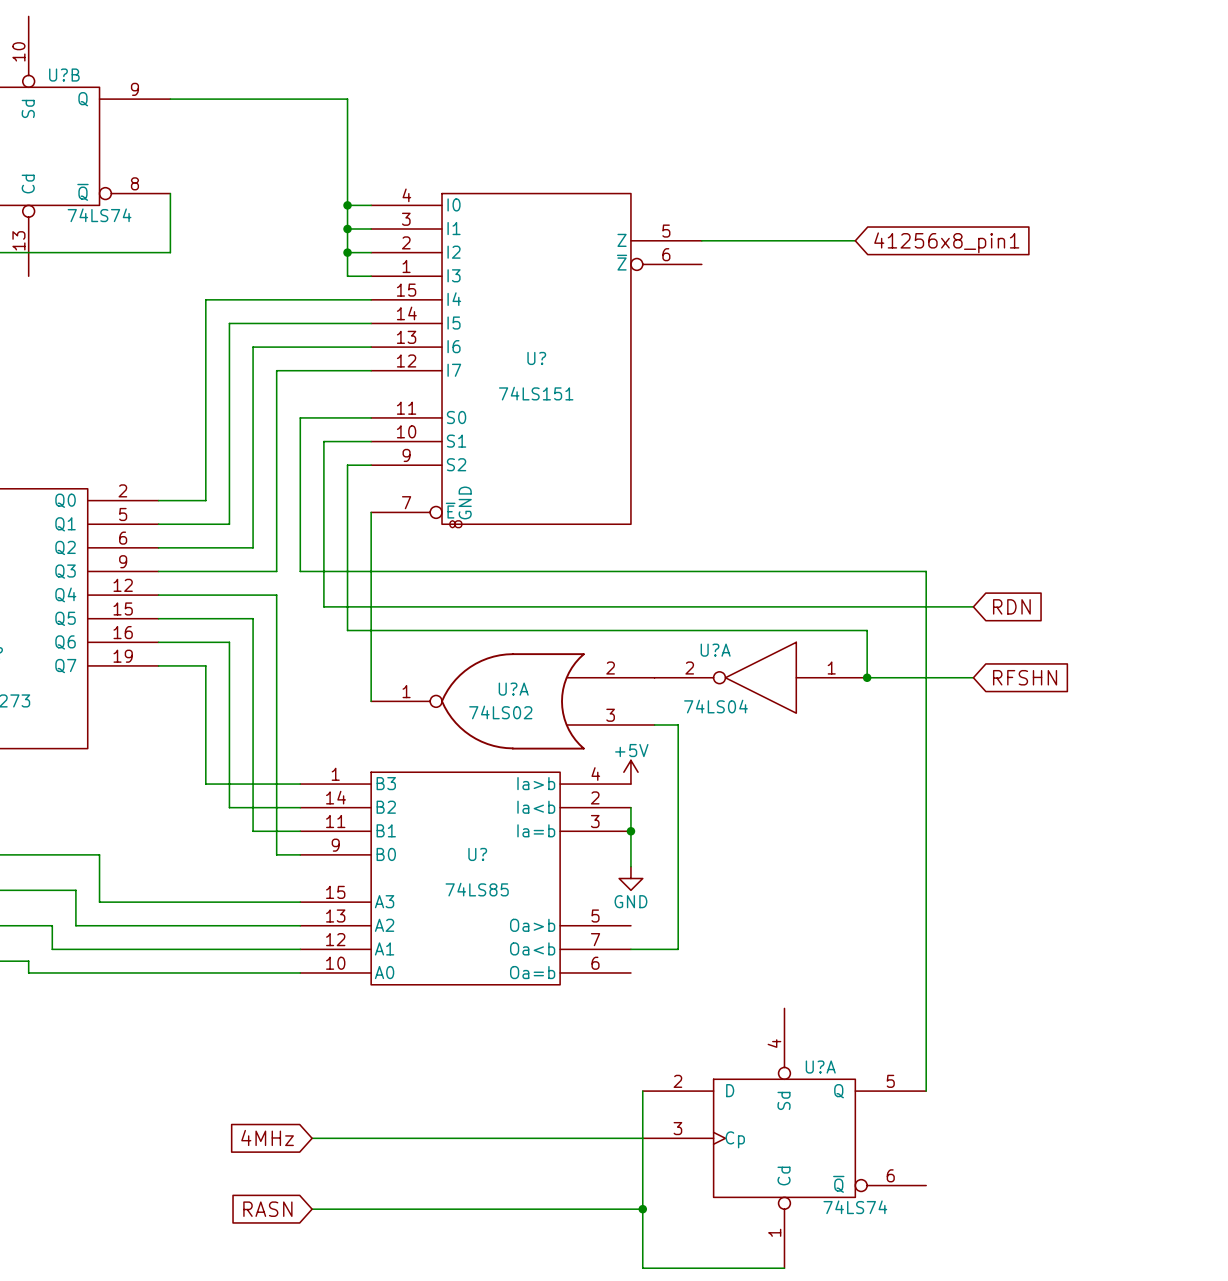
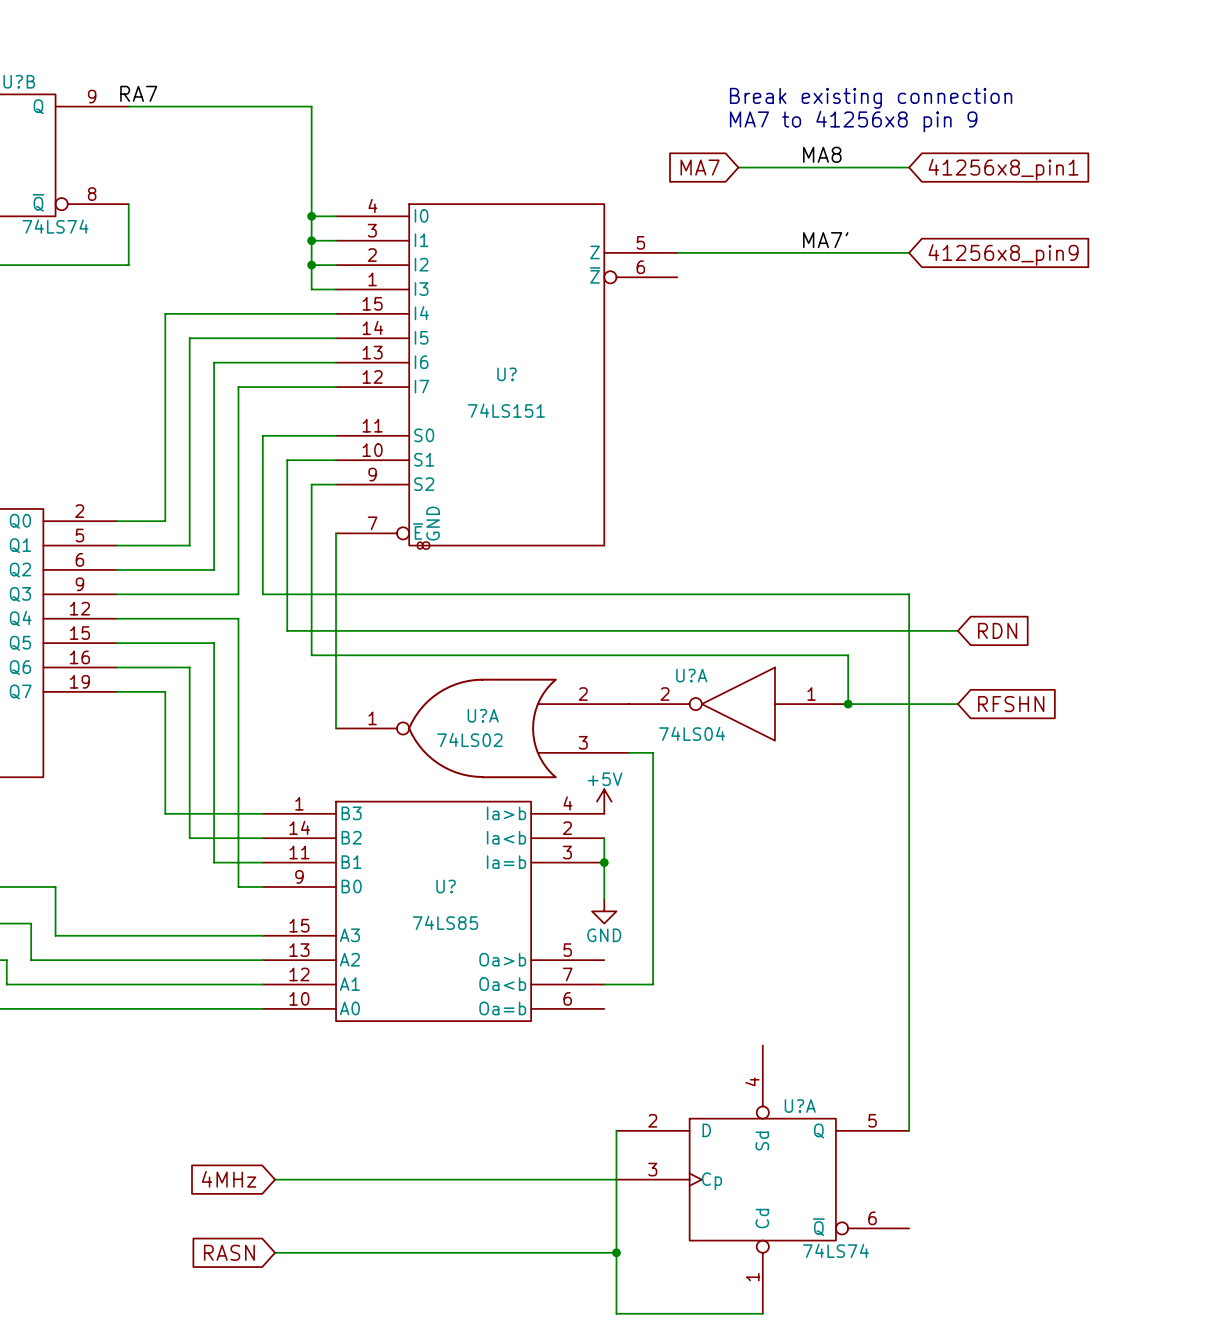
label: none -> RA7 (138, 93)
text: none -> Break existing connection (871, 98)
text: none -> MA7 to 41256x8 pin 9 (853, 121)
label: none -> MA8 (822, 154)
global label: none -> MA7 (700, 167)
wire: none -> (738, 167) (909, 167)
label: none -> MA7' (825, 240)
wire: none -> (835, 252) (909, 252)
global label position: 41256x8_pin1 (946, 242) -> 41256x8_pin1 (1003, 169)
global label: none -> 41256x8_pin9 (1003, 255)

